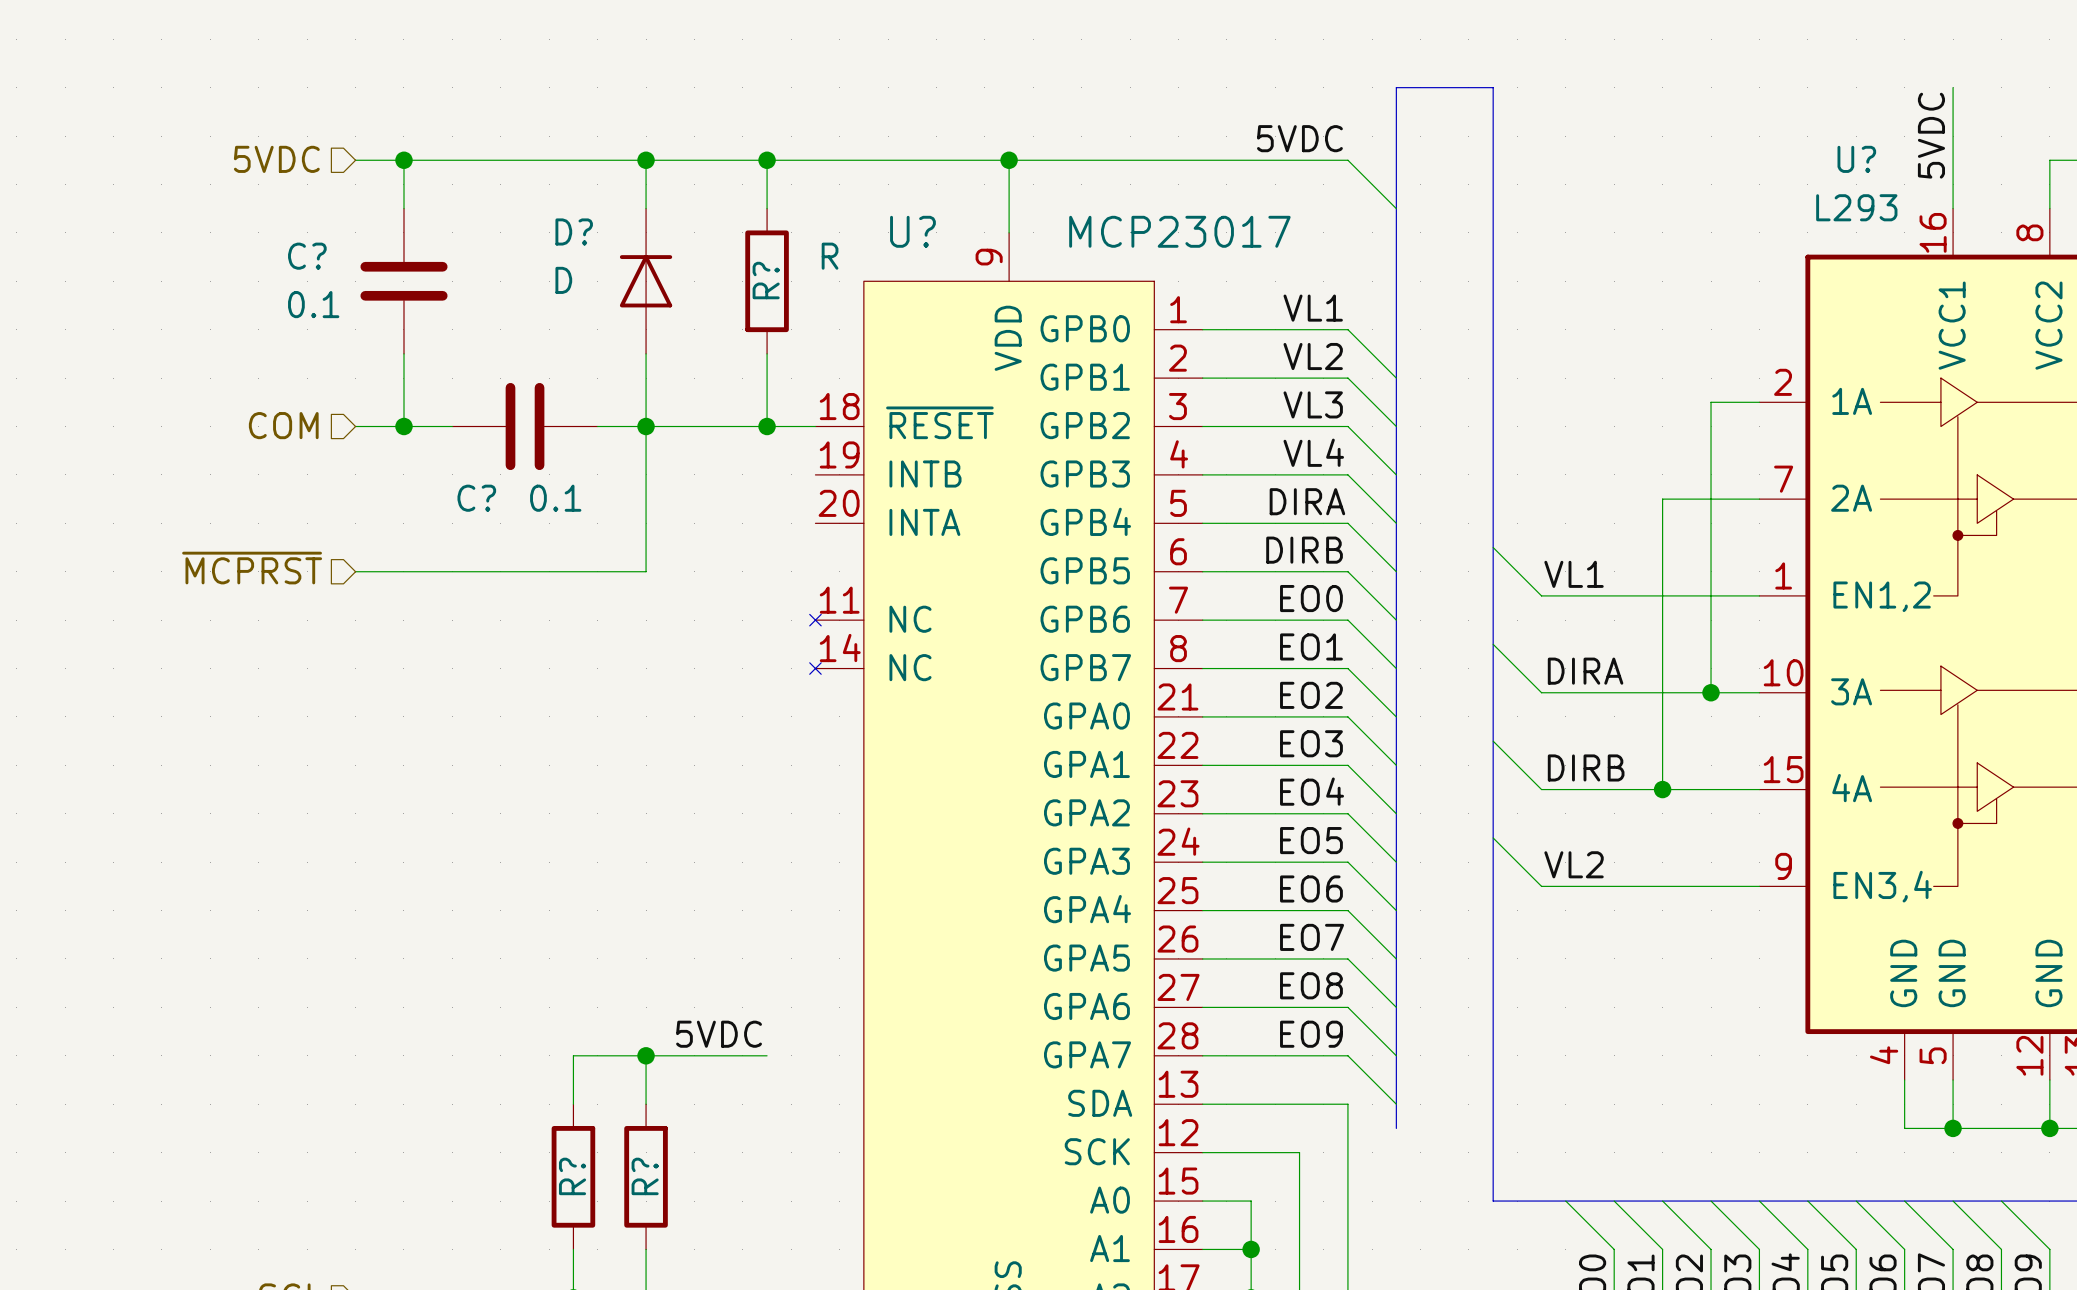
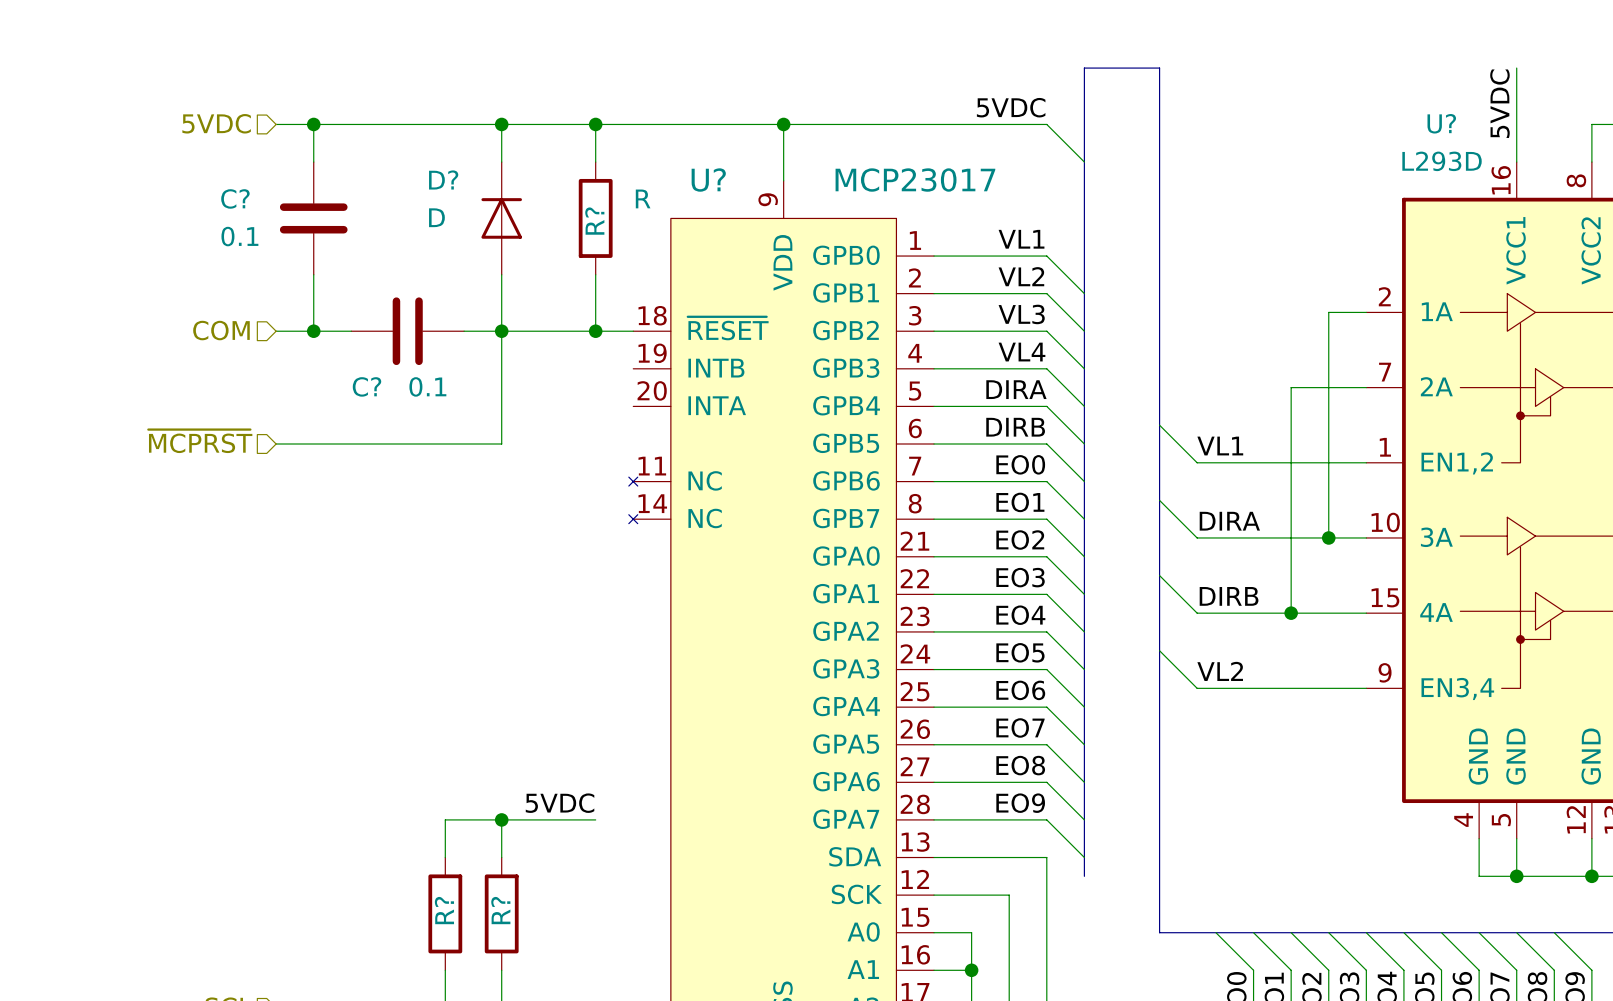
U? value: L293 (1856, 207) -> L293D (1442, 161)

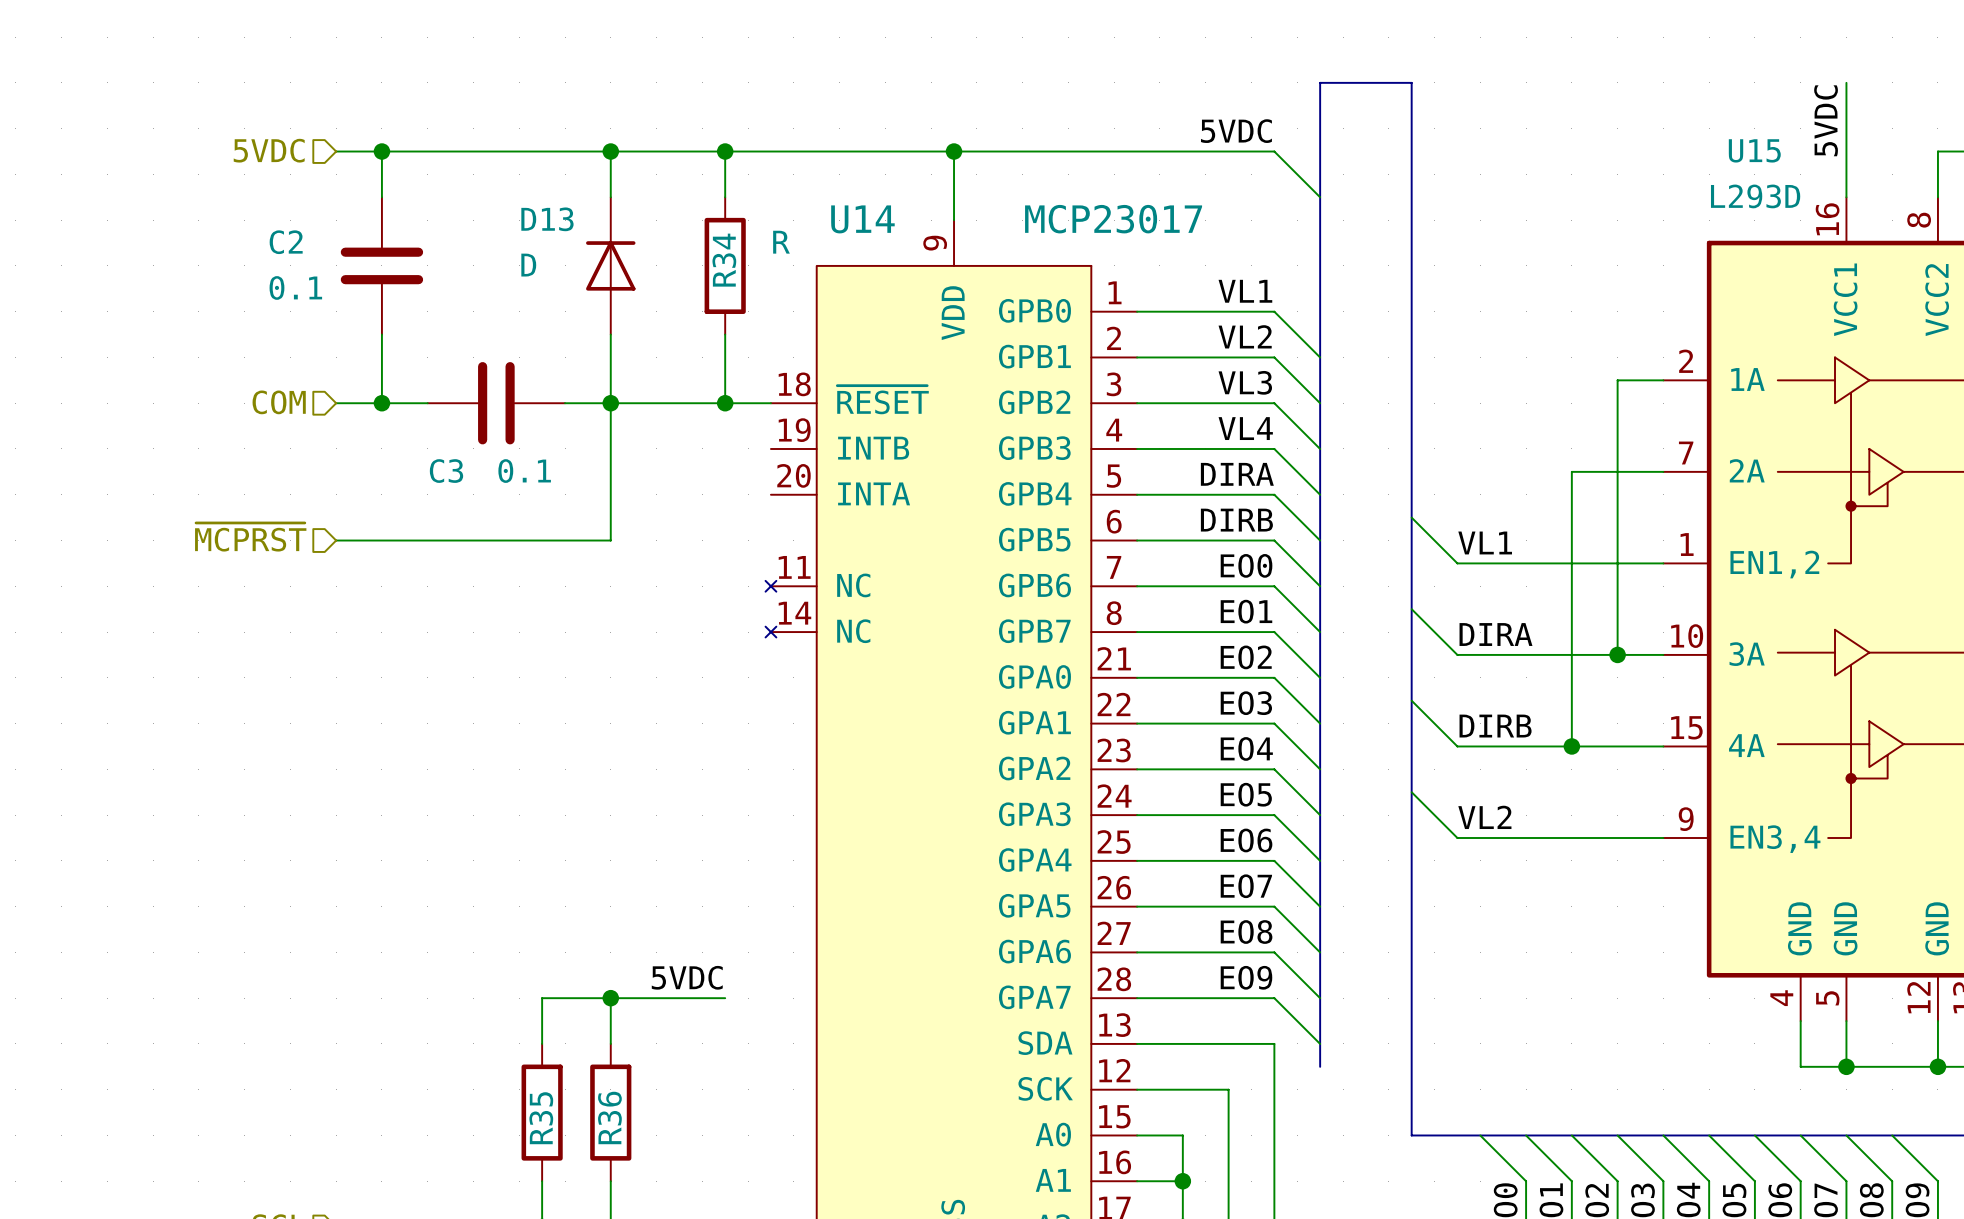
U? name: U? (1441, 123) -> U15 (1754, 150)
D? name: D? (443, 179) -> D13 (547, 219)
U? name: U? (708, 180) -> U14 (862, 219)
C? name: C? (235, 198) -> C2 (286, 242)
R? name: R? (594, 221) -> R34 (724, 260)
C? name: C? (367, 386) -> C3 (446, 471)
R? name: R? (444, 910) -> R35 (541, 1118)
R? name: R? (500, 910) -> R36 (609, 1117)

